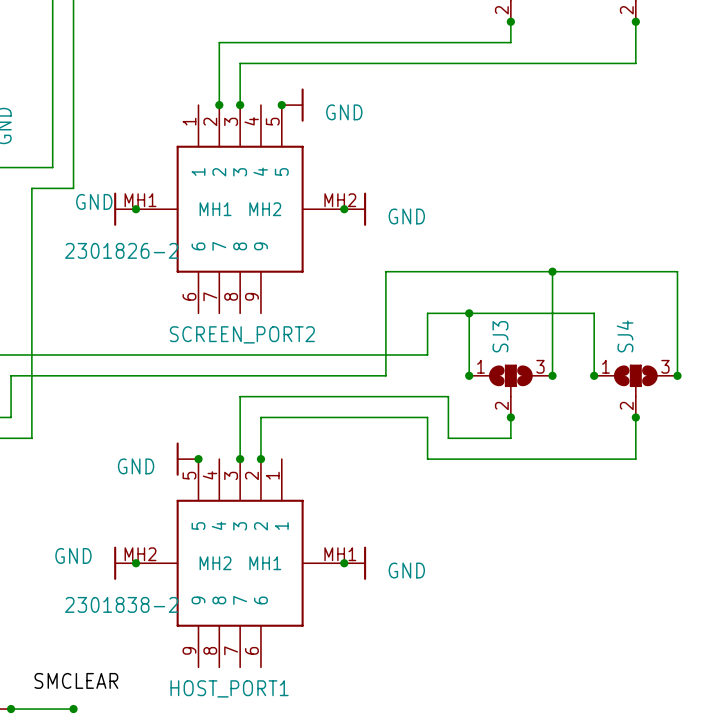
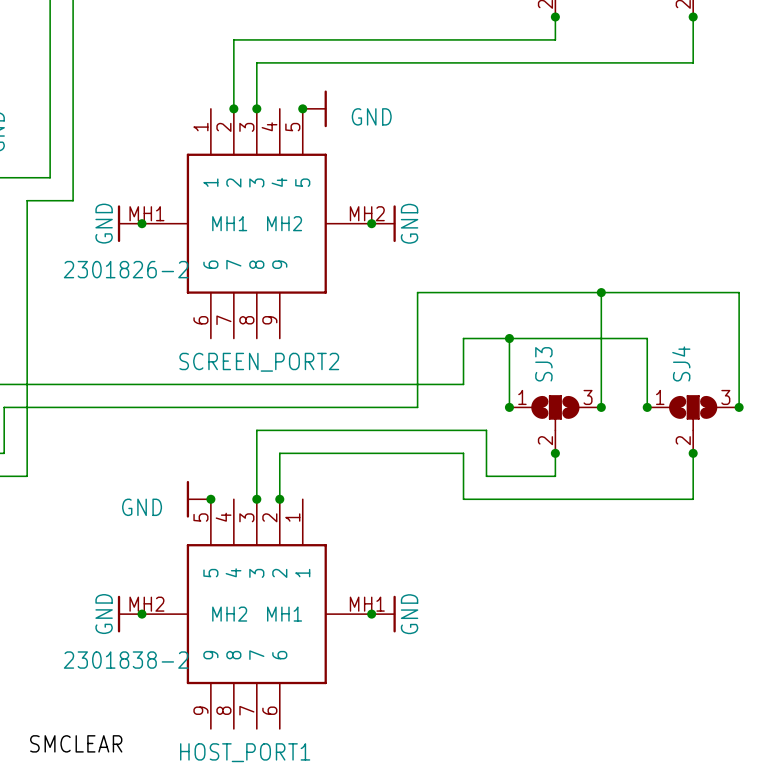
power symbol text rotation: 0° (94, 201) -> 90° counterclockwise (104, 223)
power symbol text rotation: 0° (406, 216) -> 90° counterclockwise (409, 223)
power symbol text rotation: 0° (73, 555) -> 90° counterclockwise (104, 614)
power symbol text rotation: 0° (406, 570) -> 90° counterclockwise (409, 614)

